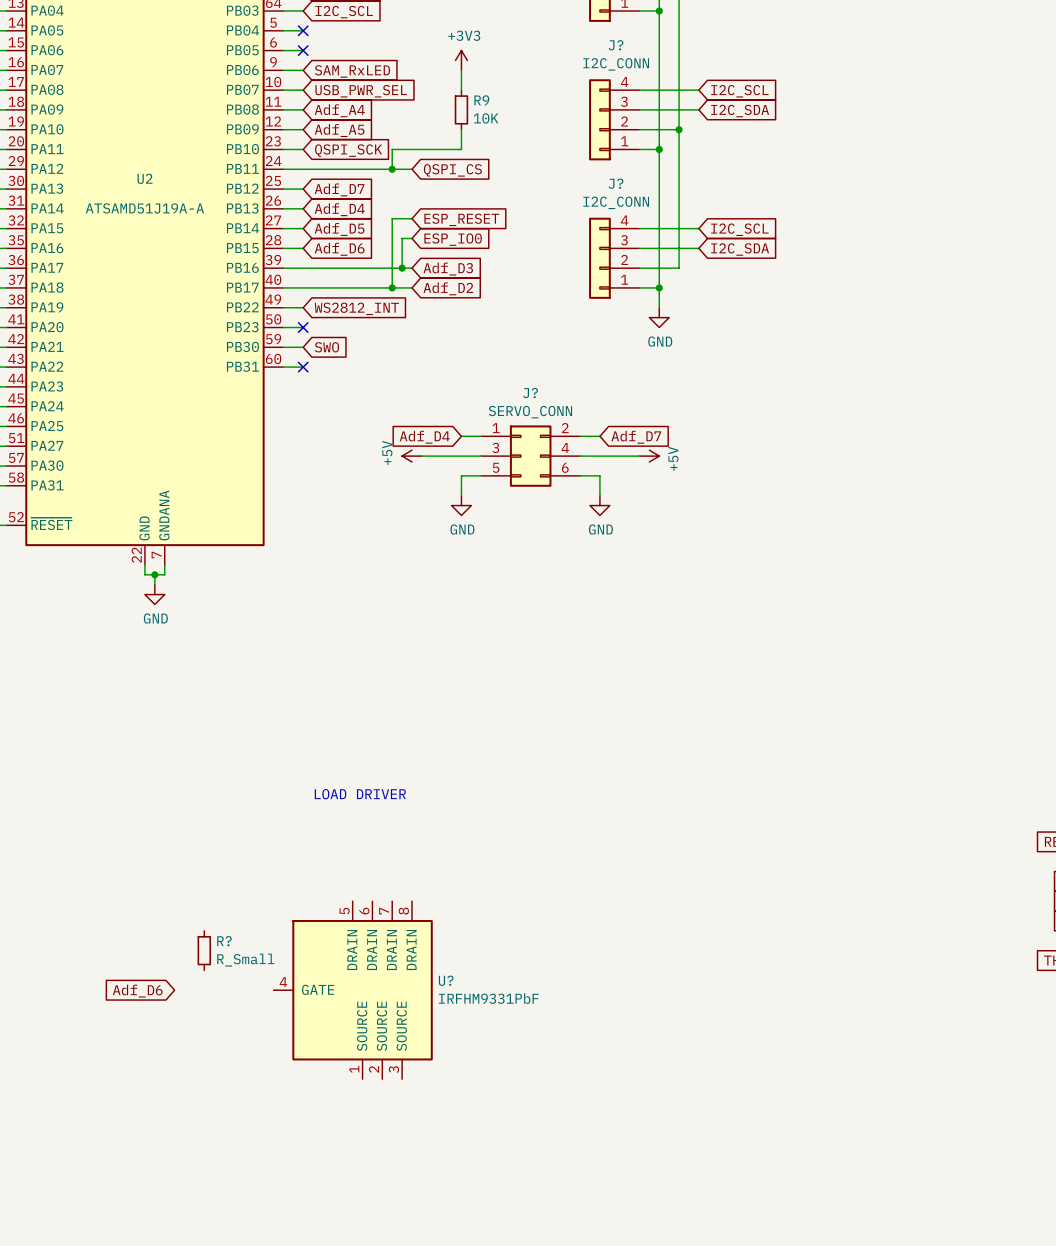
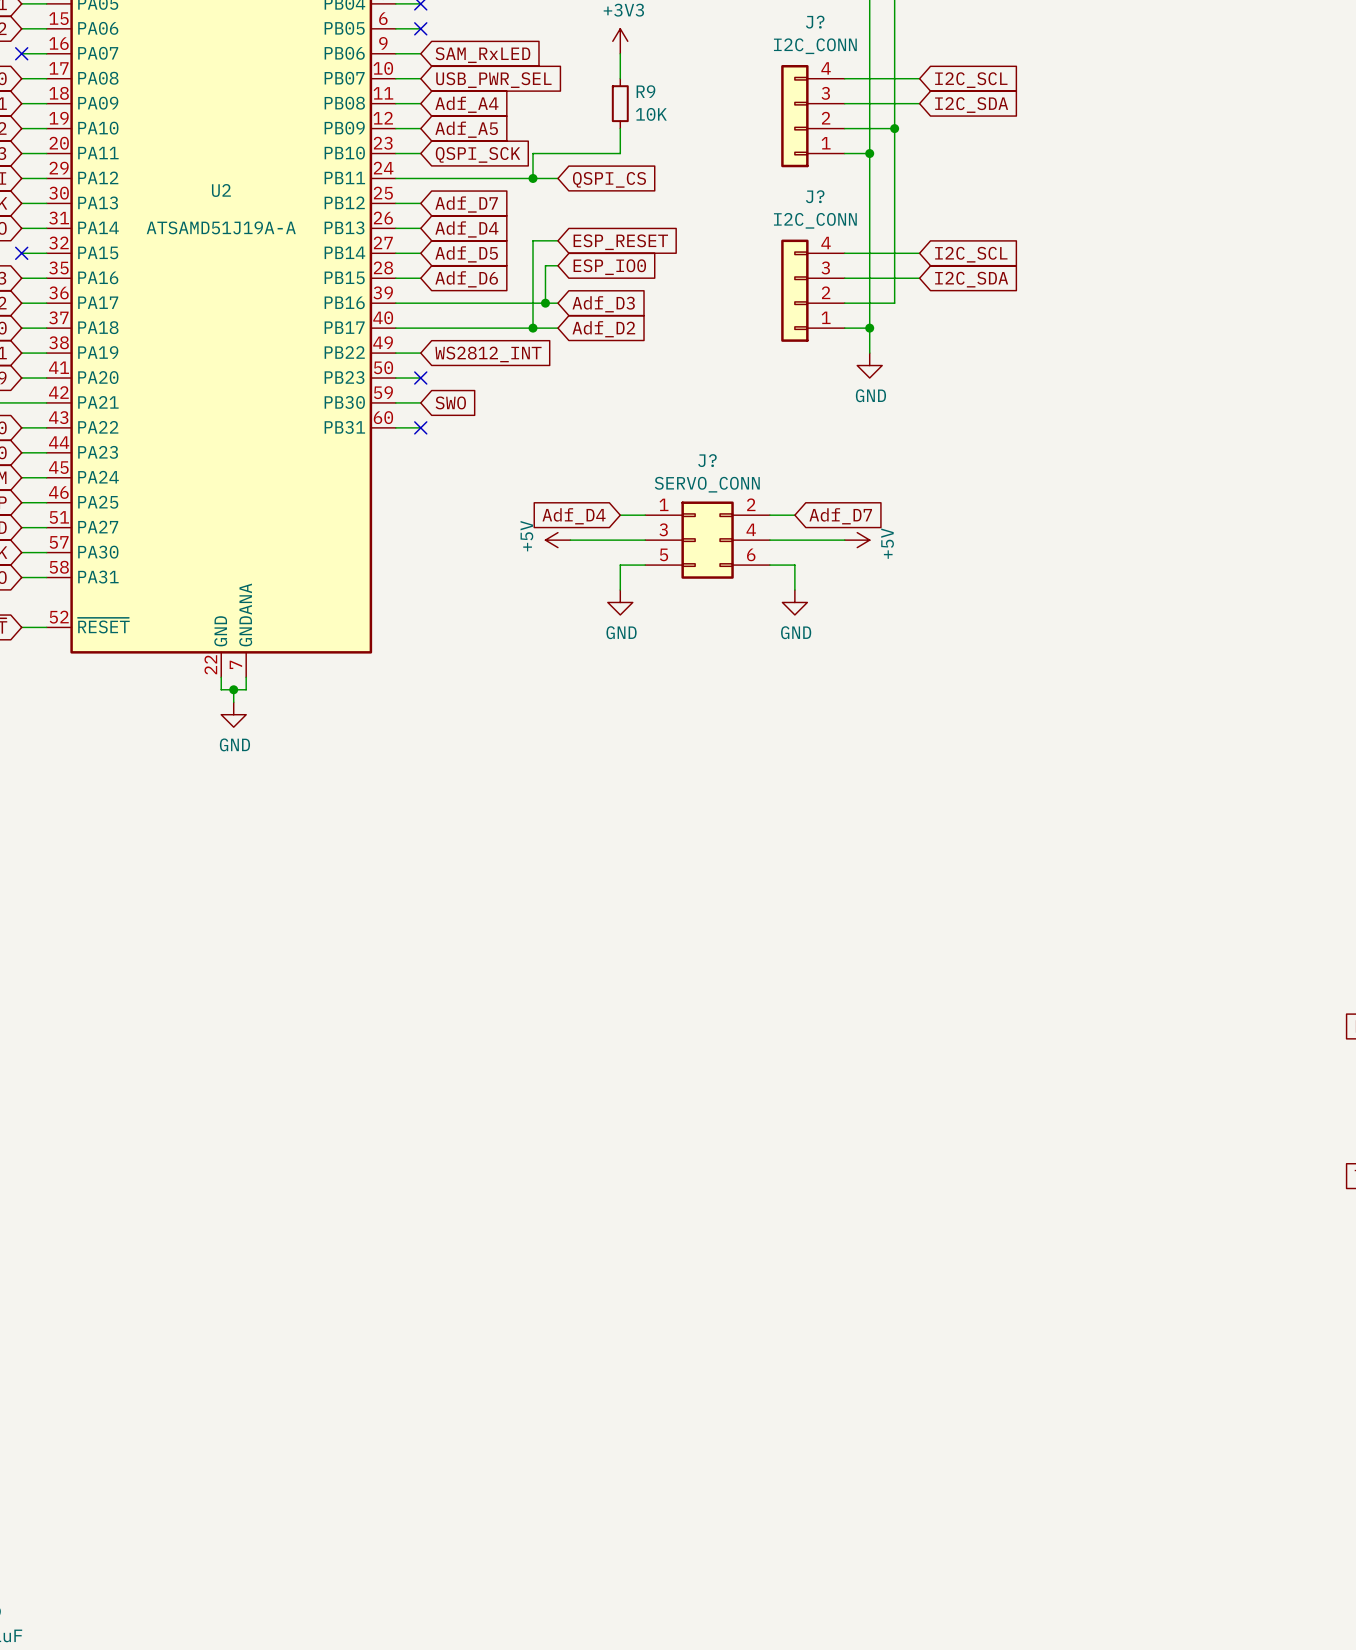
text: LOAD DRIVER (360, 794) -> none
R?: R_Small (204, 950) -> none
U?: IRFHM9331PbF (353, 990) -> none
global label: Adf_D6 (137, 991) -> none

